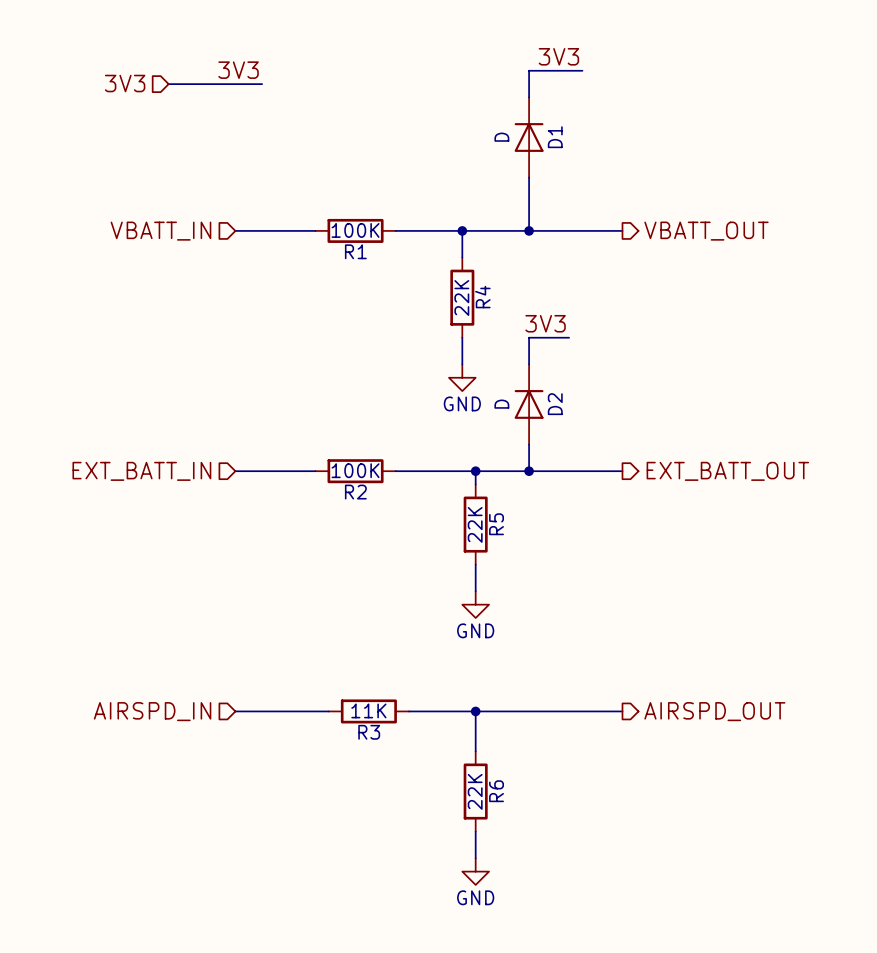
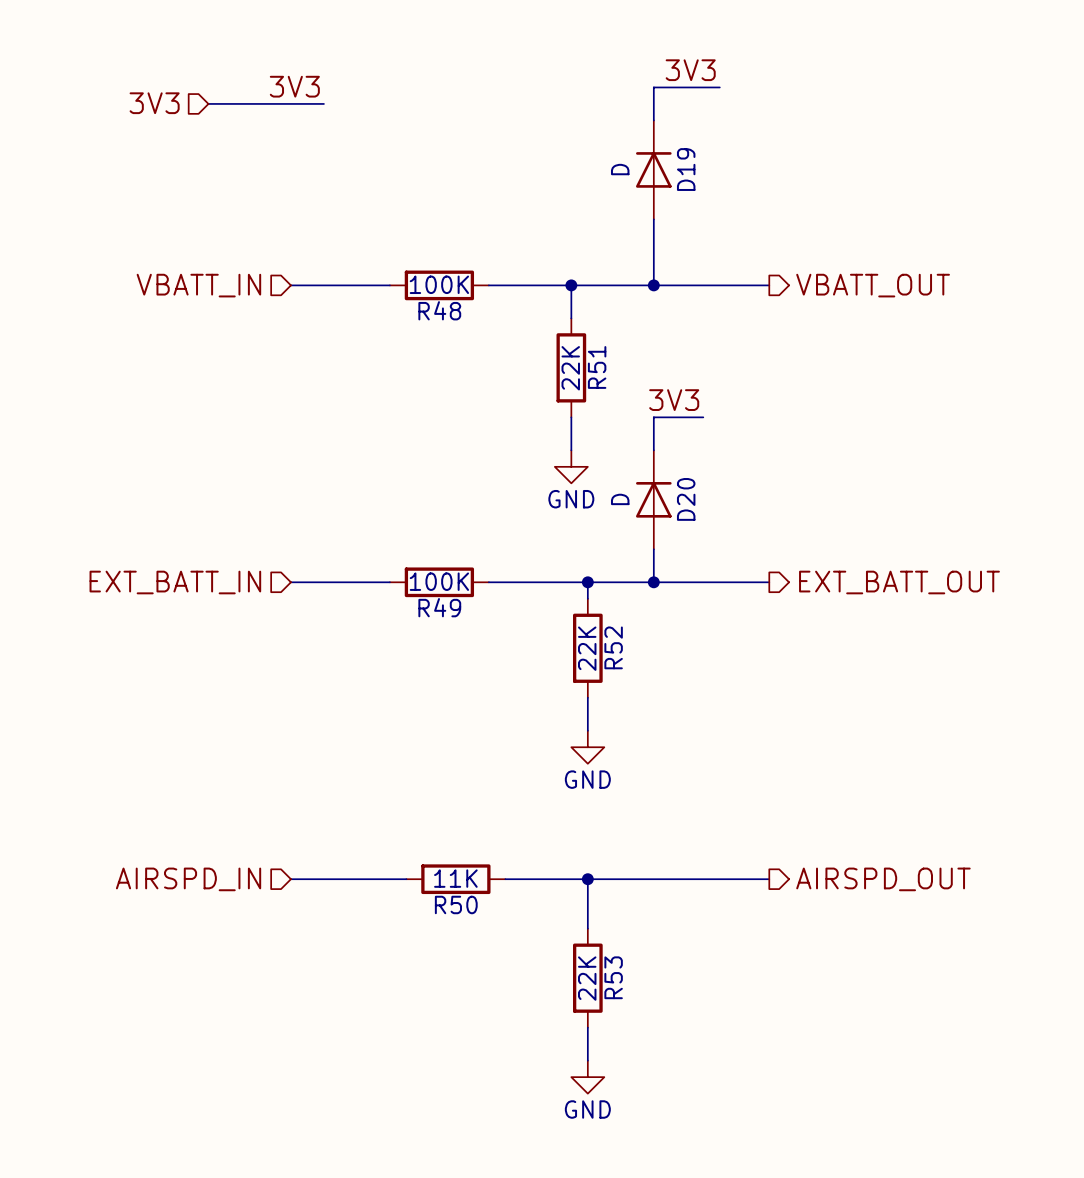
D1 name: D1 (555, 137) -> D19 (686, 169)
R1 name: R1 (355, 251) -> R48 (439, 310)
R4 name: R4 (482, 297) -> R51 (597, 367)
D2 name: D2 (555, 404) -> D20 (686, 499)
R2 name: R2 (355, 492) -> R49 (439, 607)
R5 name: R5 (496, 524) -> R52 (613, 647)
R3 name: R3 (369, 732) -> R50 (456, 904)
R6 name: R6 (496, 791) -> R53 (613, 977)

